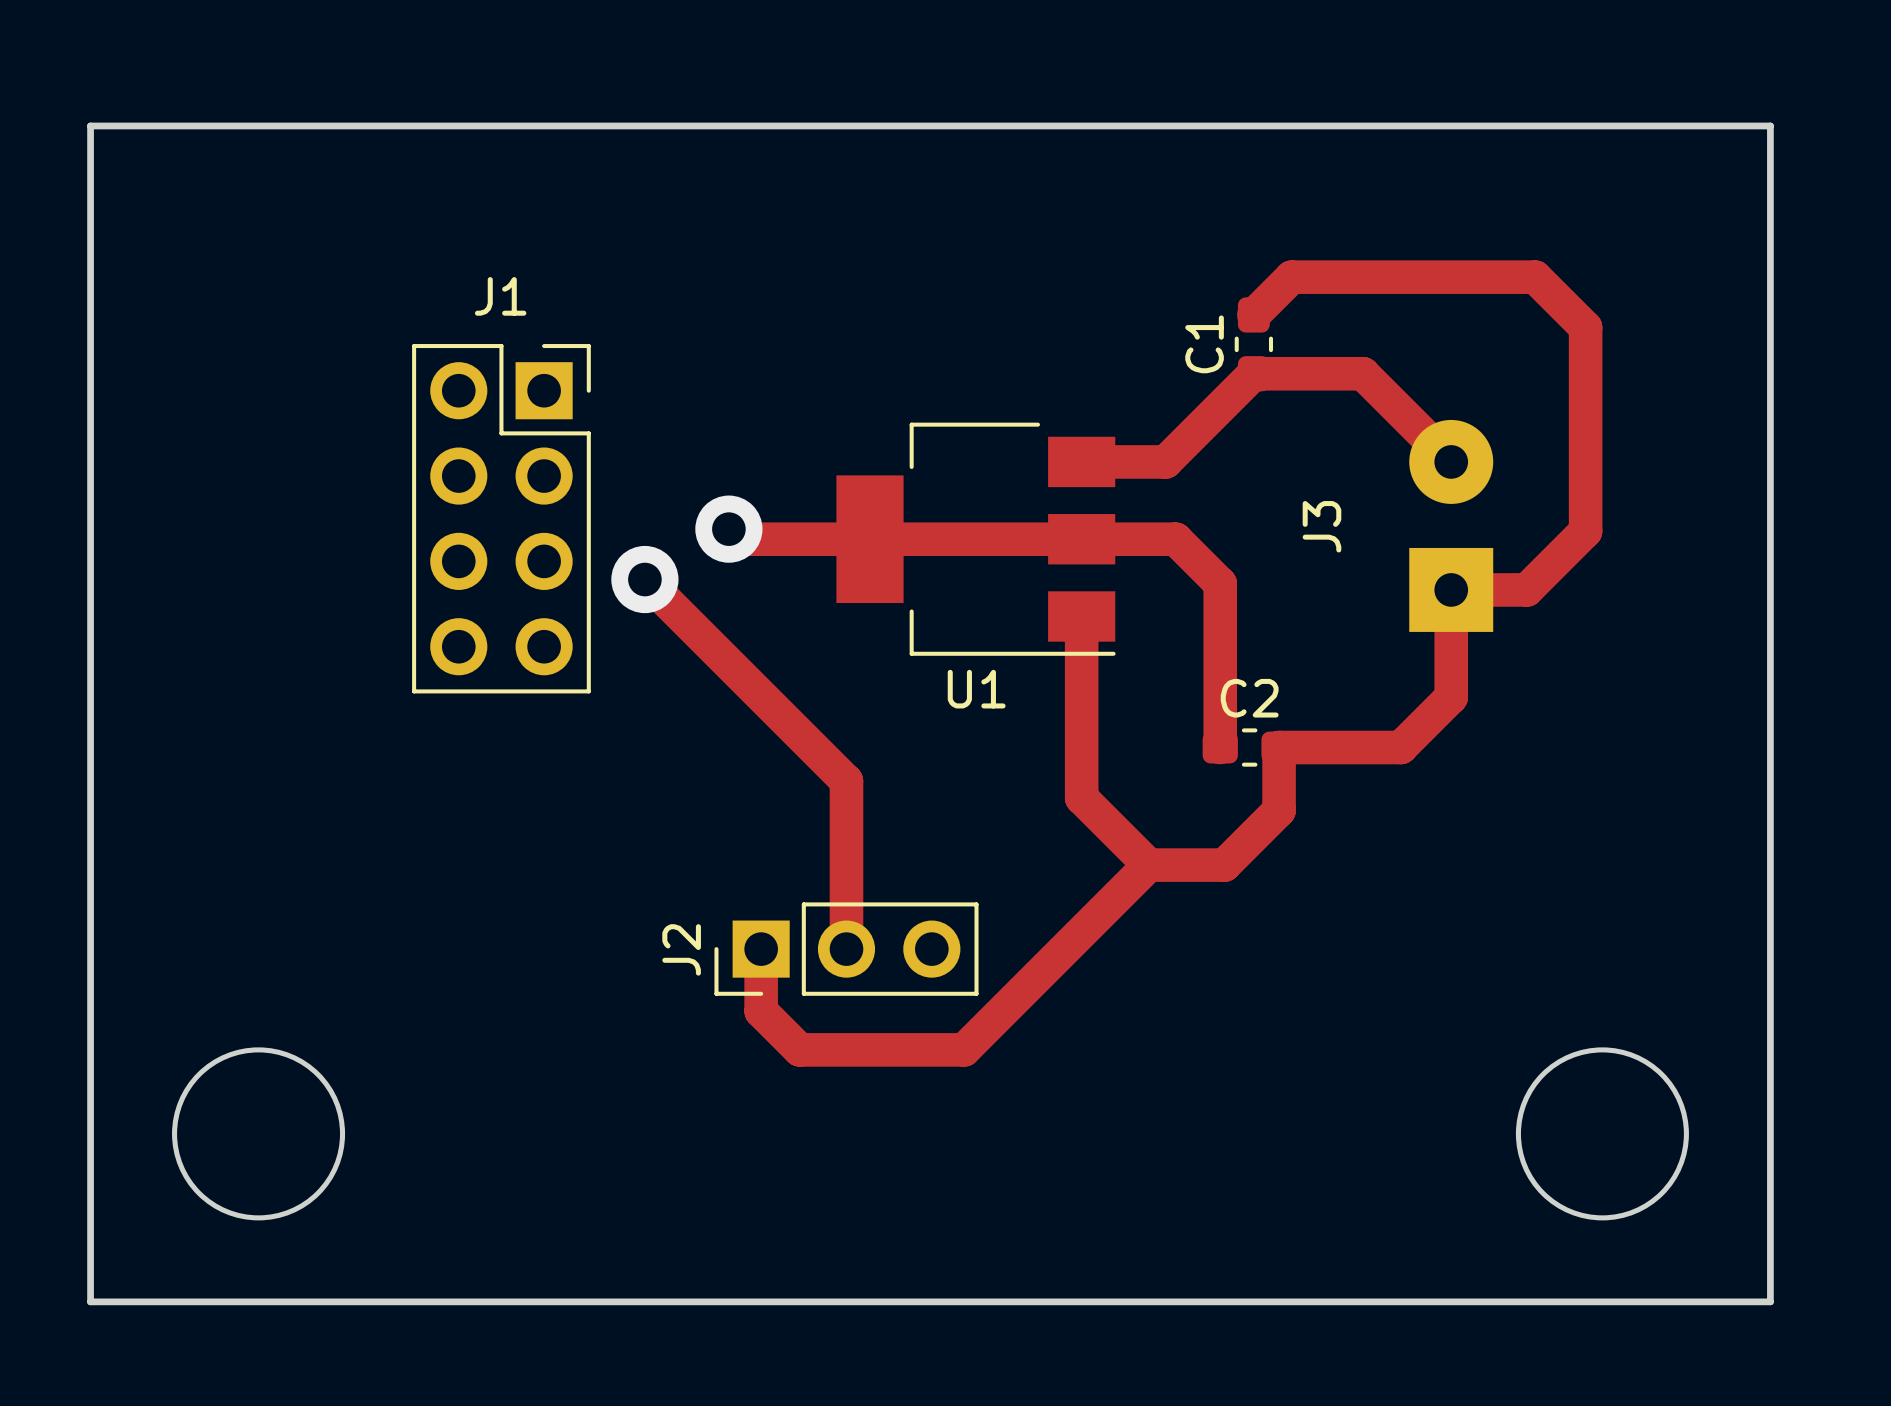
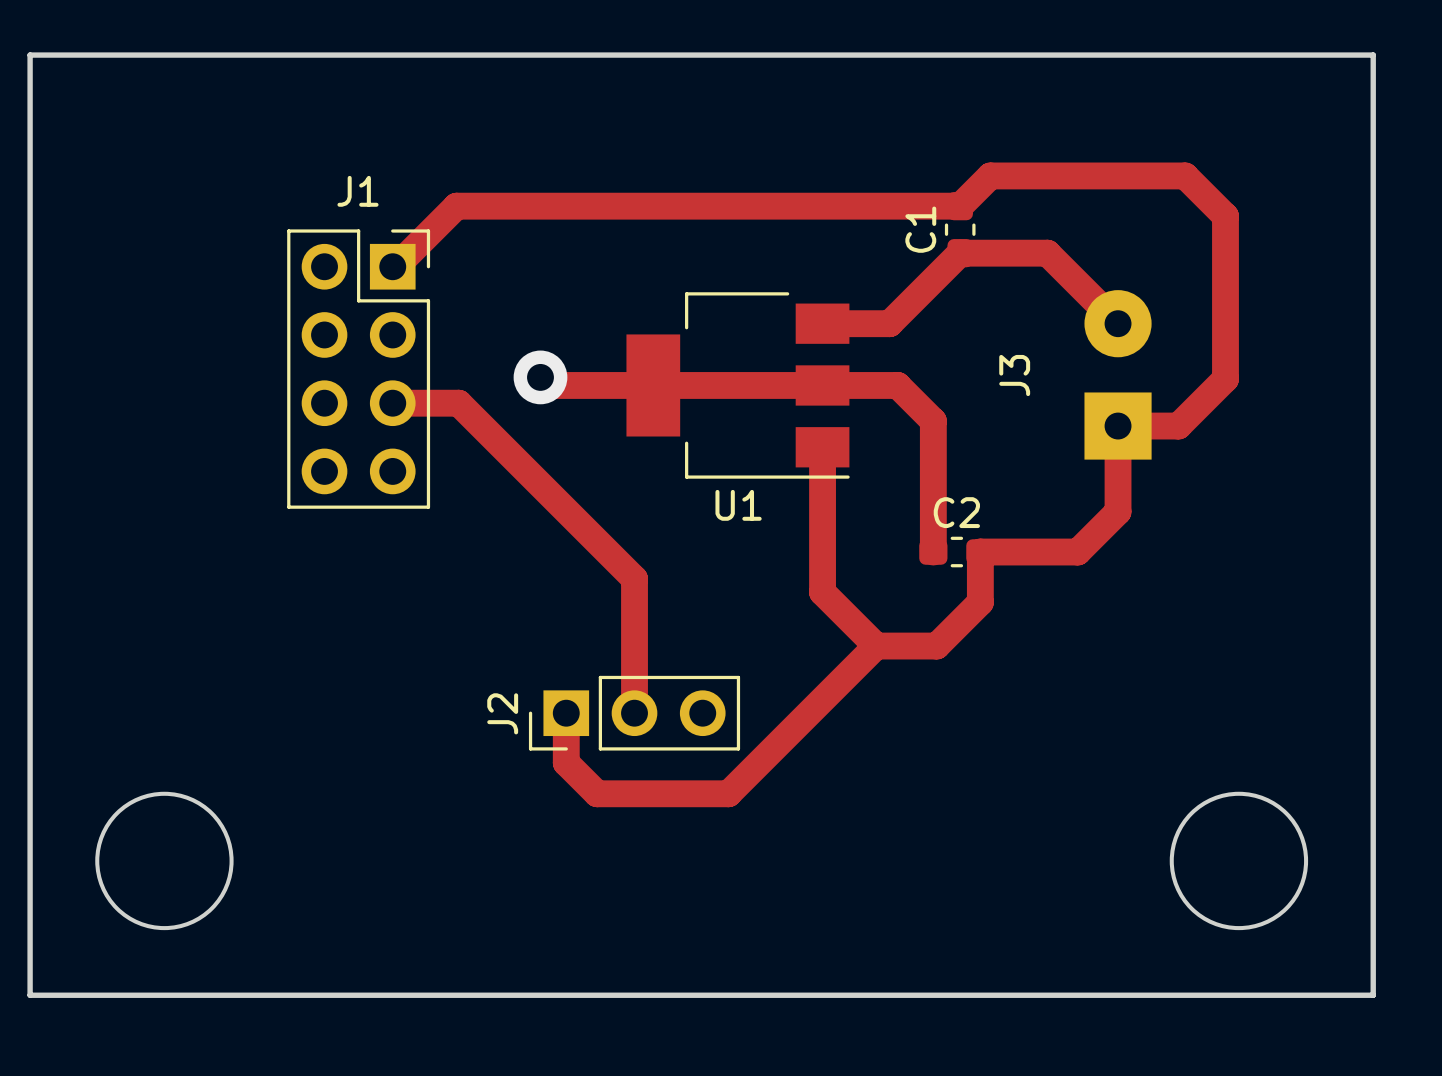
track: none -> (960, 206) (456, 206) (395, 266) (392, 266)
track: none -> (392, 403) (458, 403) (473, 417)
via: (644, 579) -> none

